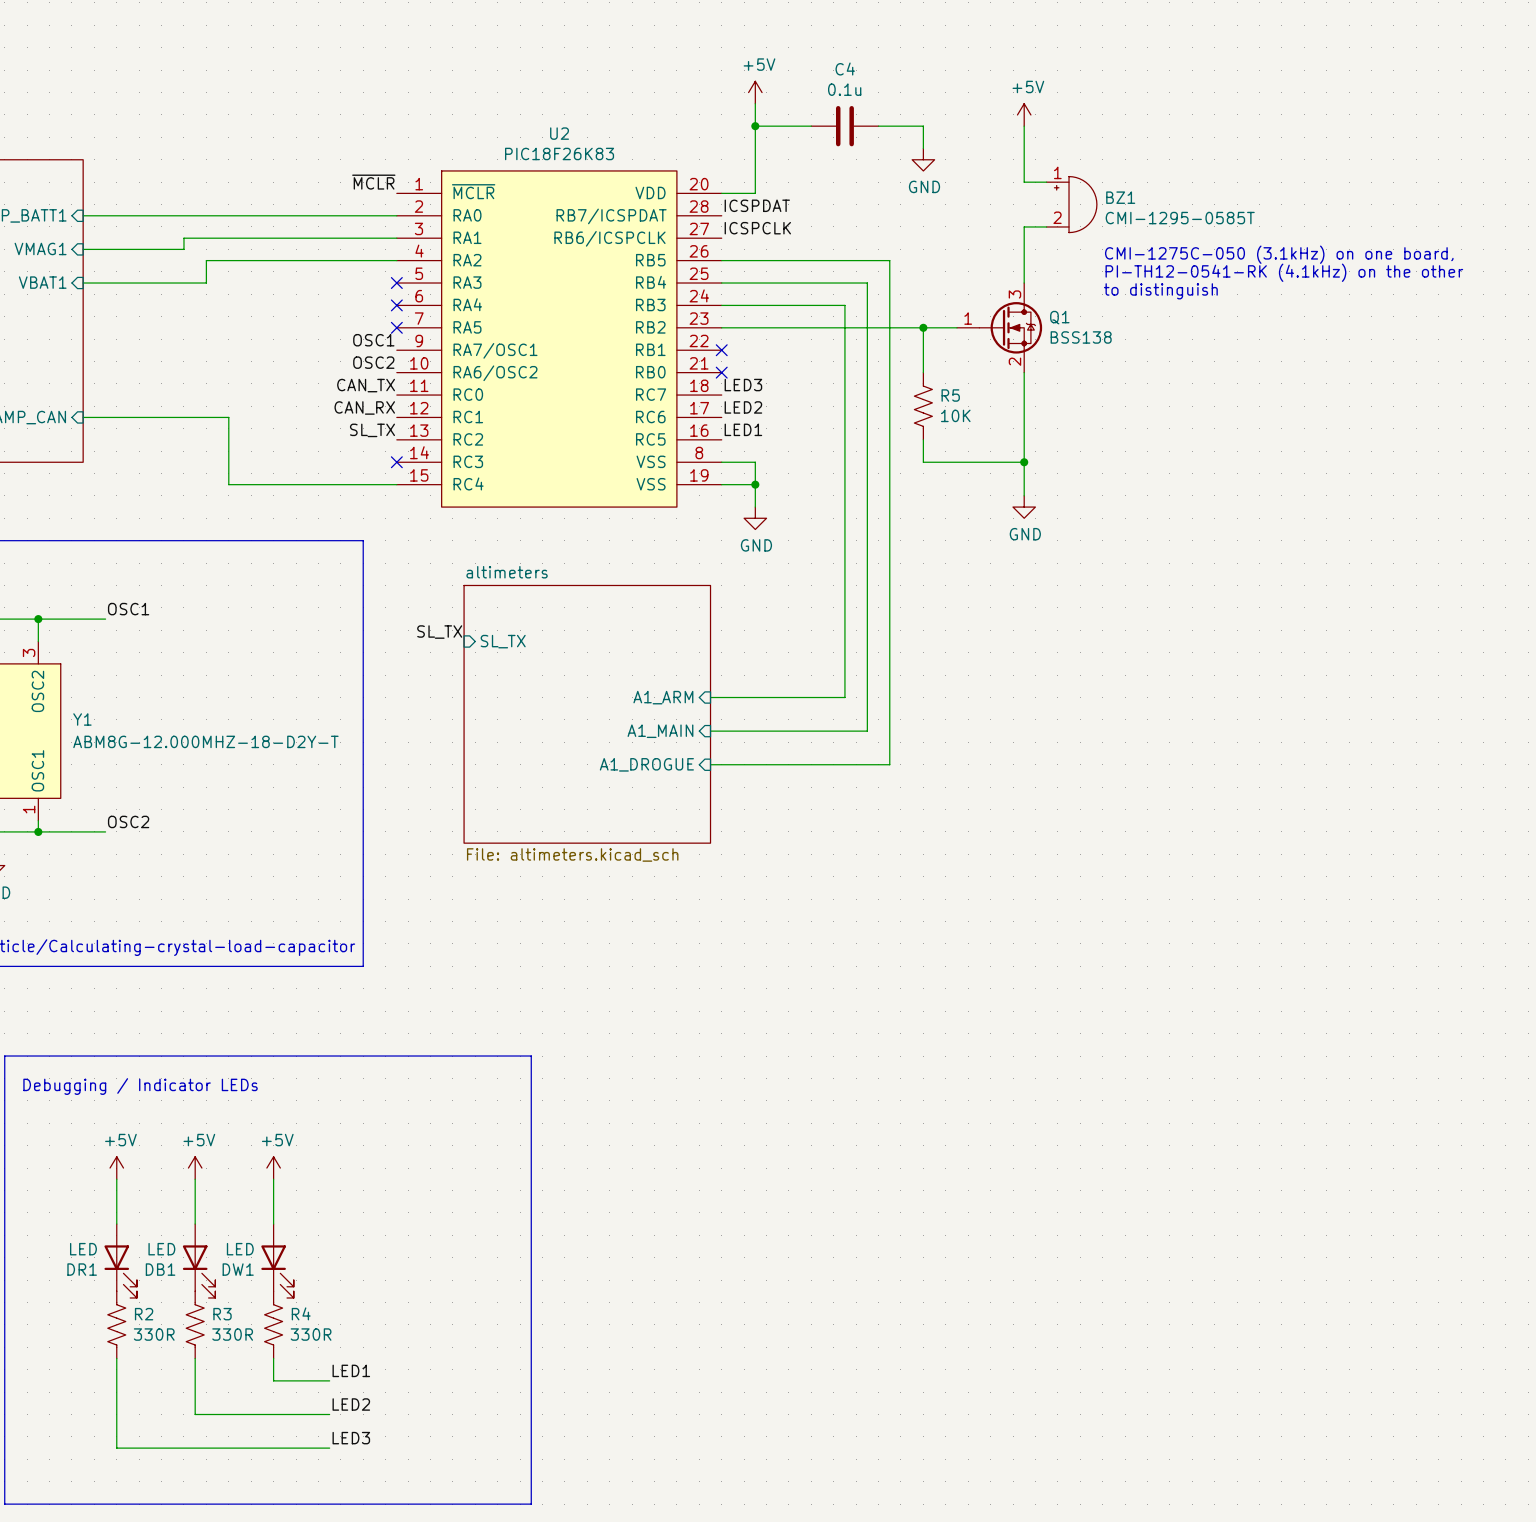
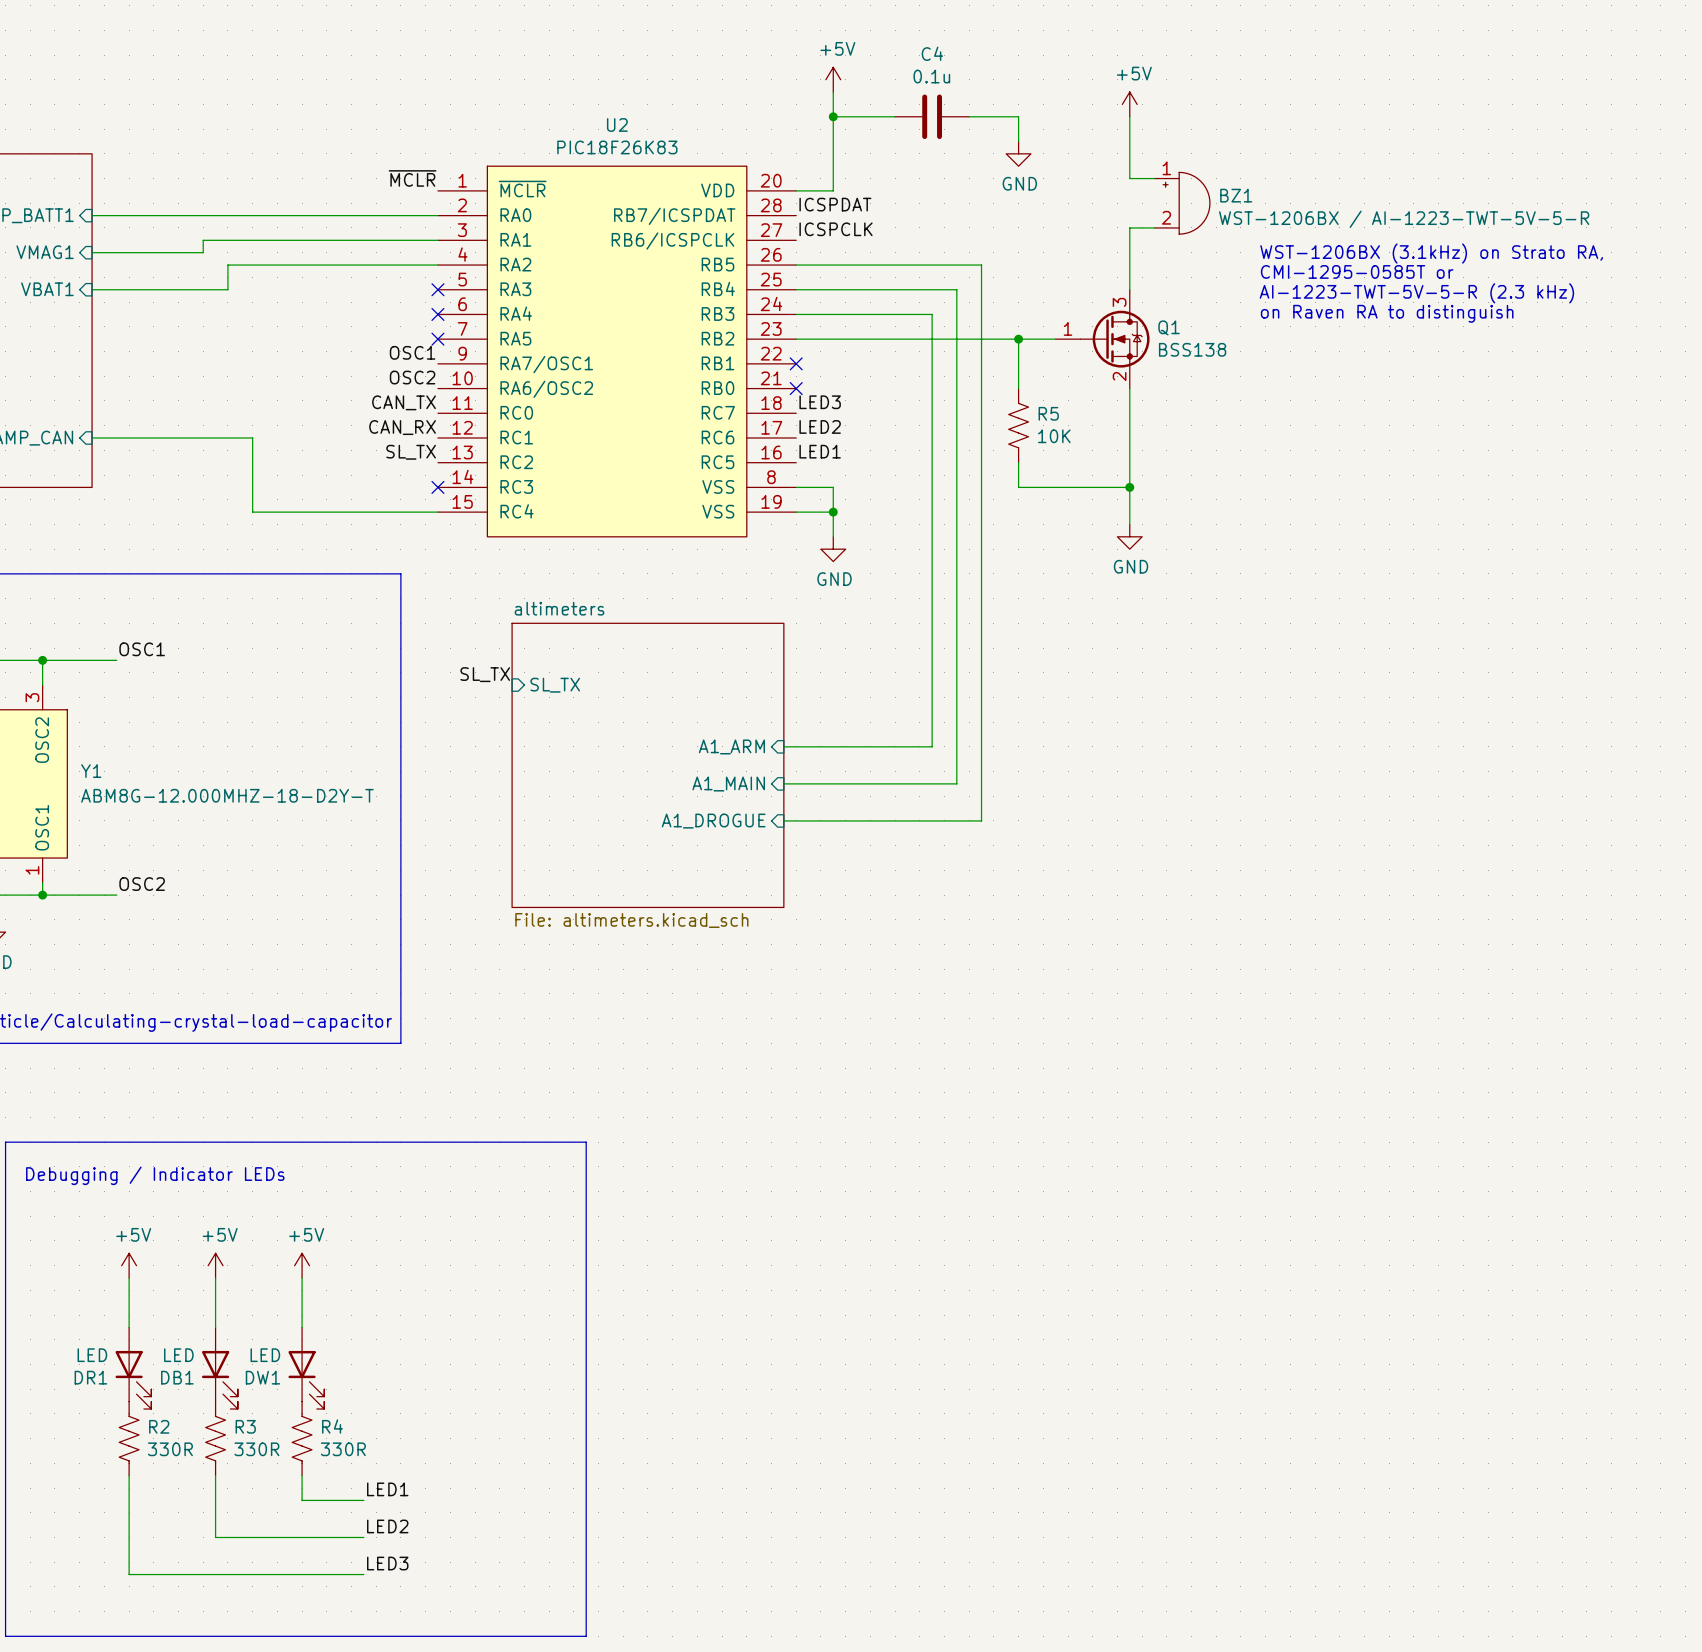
BZ1 value: CMI-1295-0585T (1180, 218) -> WST-1206BX / AI-1223-TWT-5V-5-R (1404, 219)
text: none -> WST-1206BX (3.1kHz) on Strato RA, (1431, 253)
text: CMI-1275C-050 (3.1kHz) on one board, (1279, 254) -> none
text: none -> CMI-1295-0585T or (1357, 271)
text: PI-TH12-0541-RK (4.1kHz) on the other (1284, 272) -> none
text: none -> AI-1223-TWT-5V-5-R (2.3 kHz) (1416, 293)
text: to distinguish (1160, 291) -> on Raven RA to distinguish (1387, 313)

